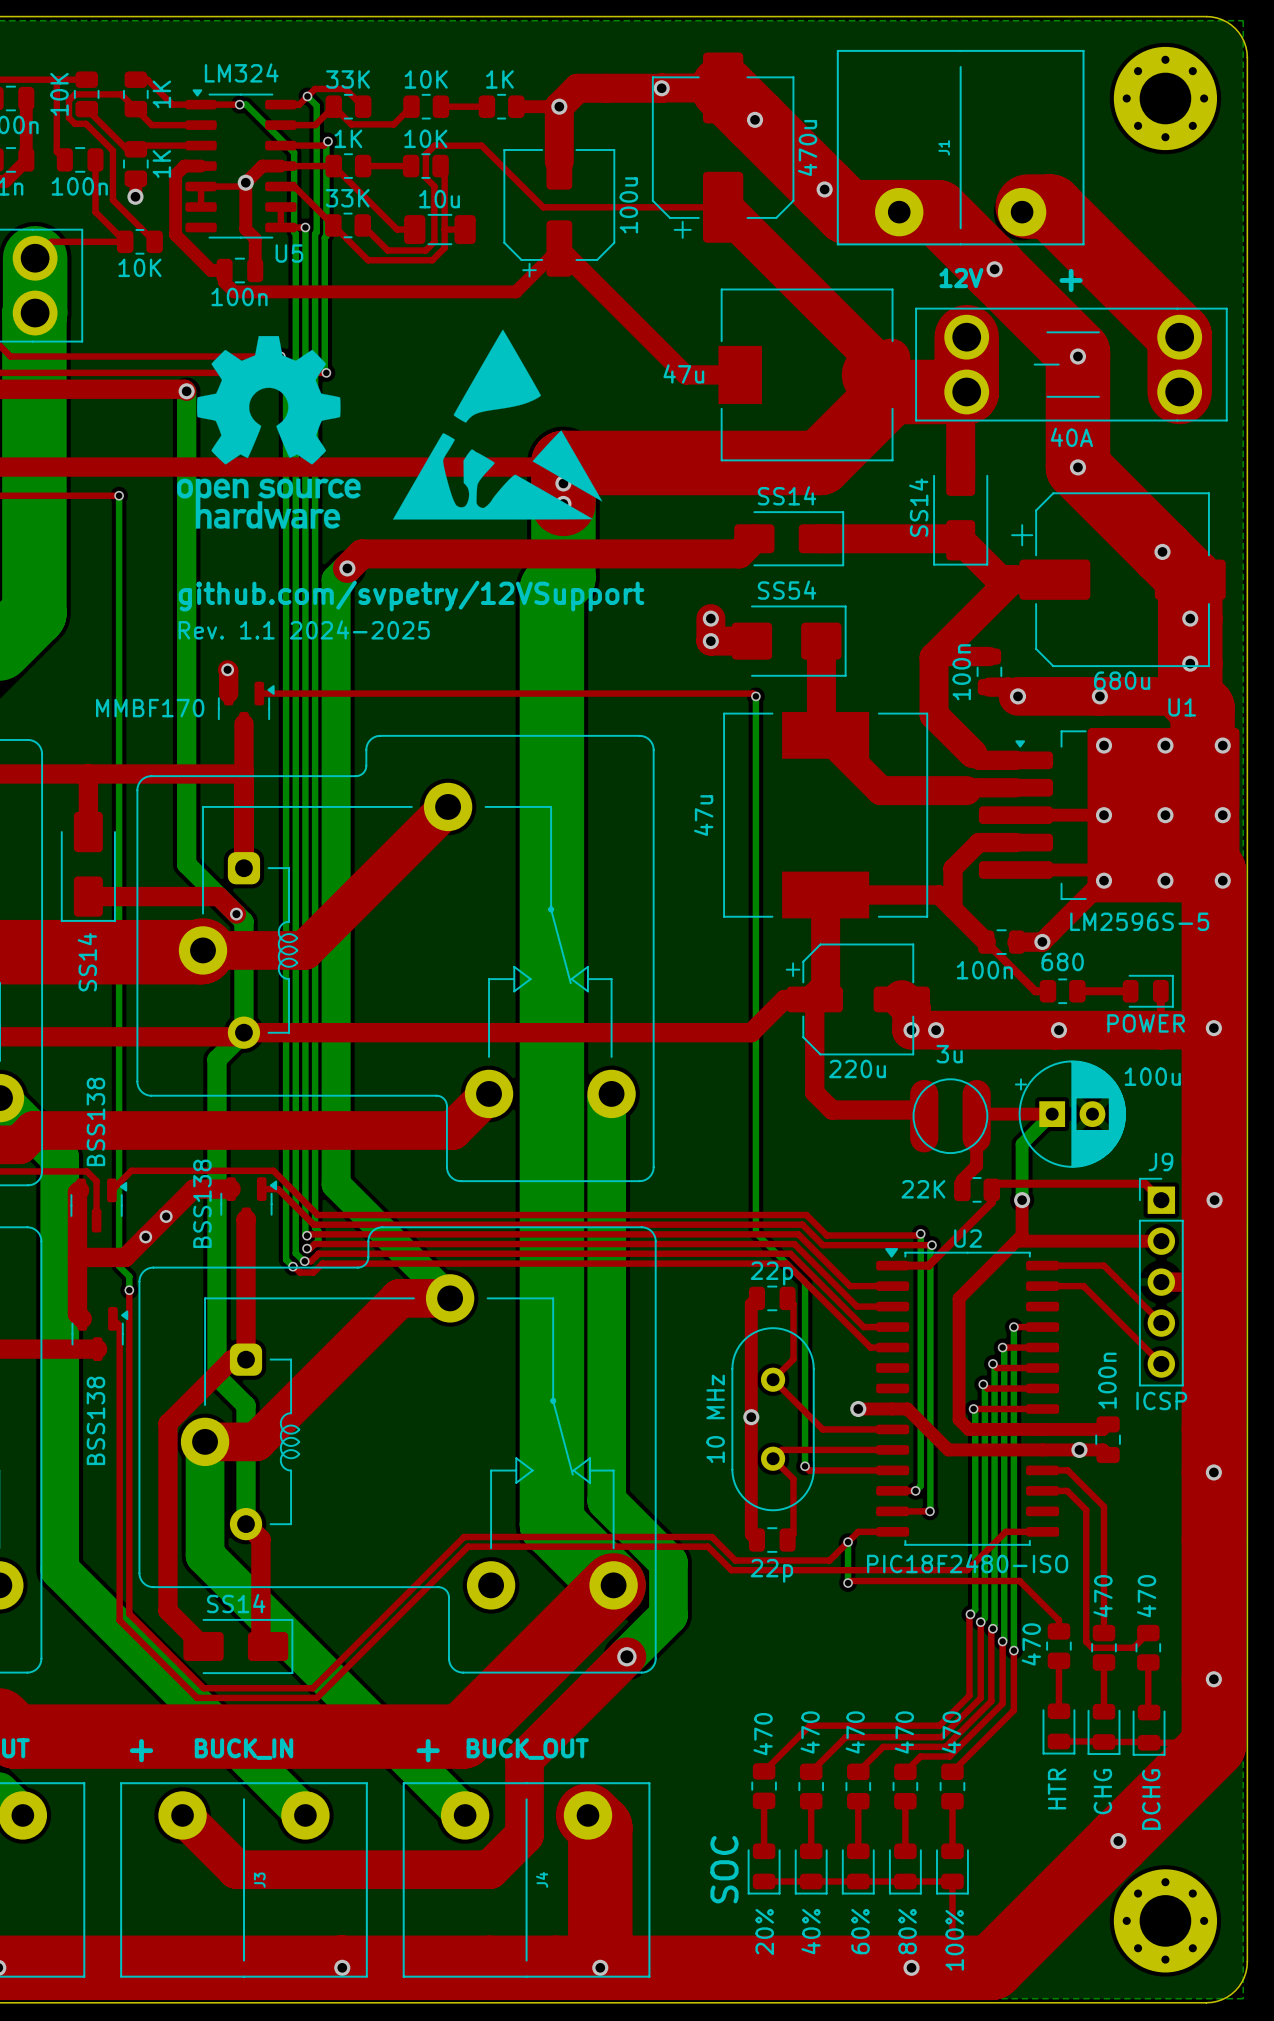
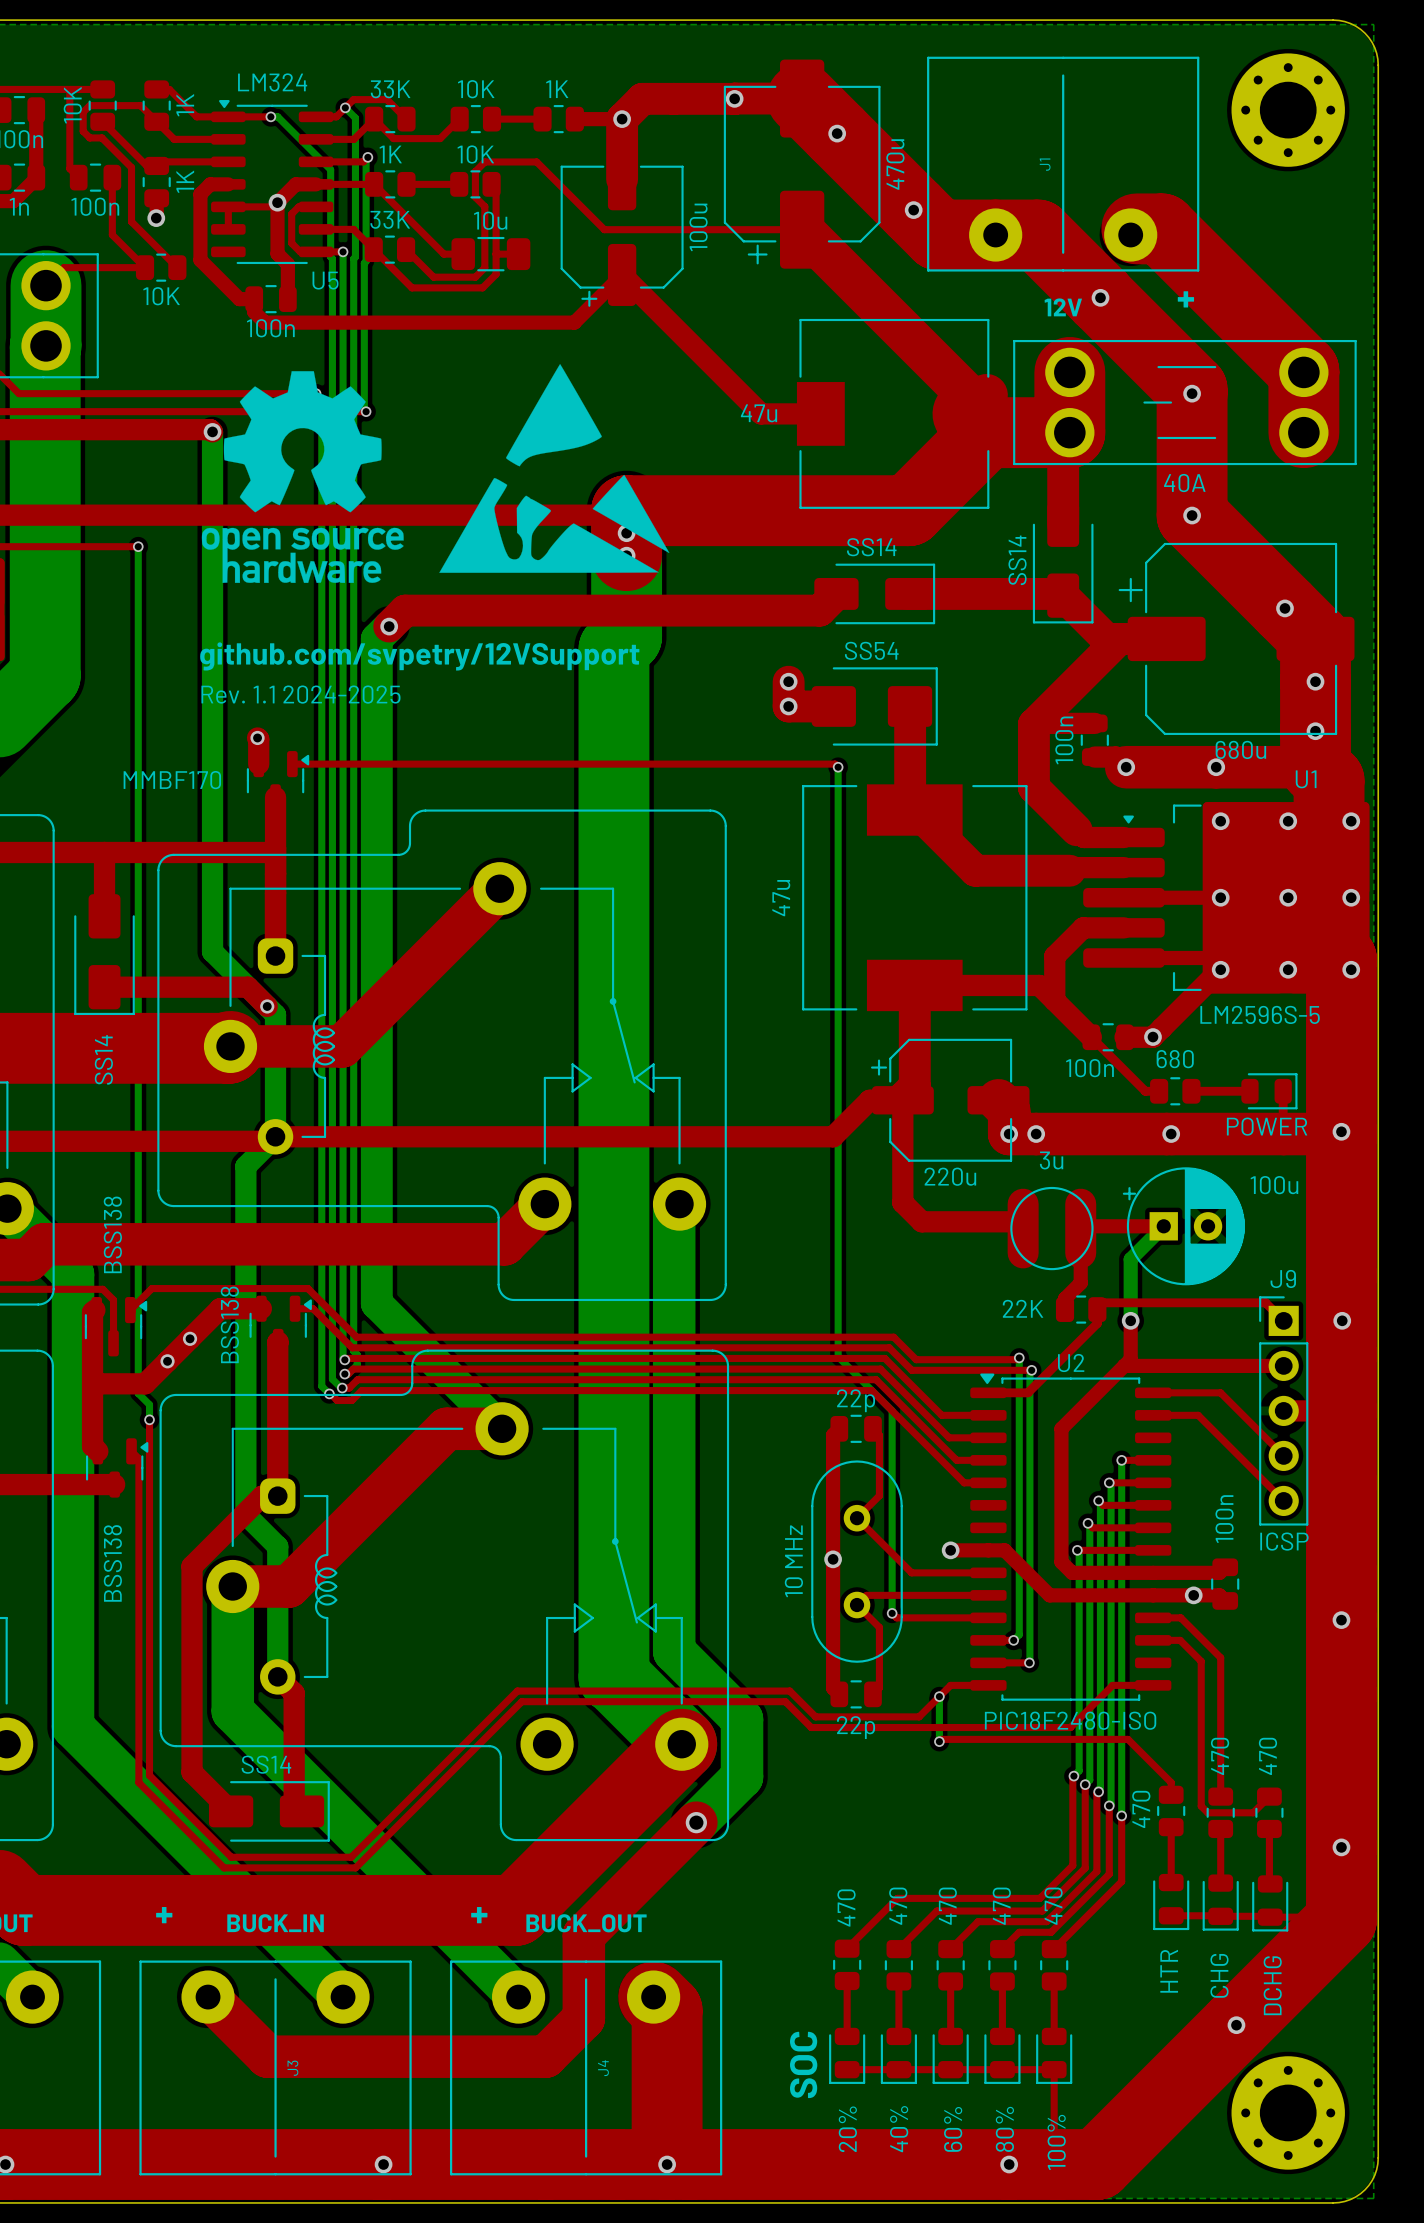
top track: (280, 186) (294, 186) (314, 207) -> (316, 229) (353, 229)
top track: (280, 207) (280, 227) -> (316, 206) (298, 206) (291, 213) (291, 243) (300, 251) (316, 251)

